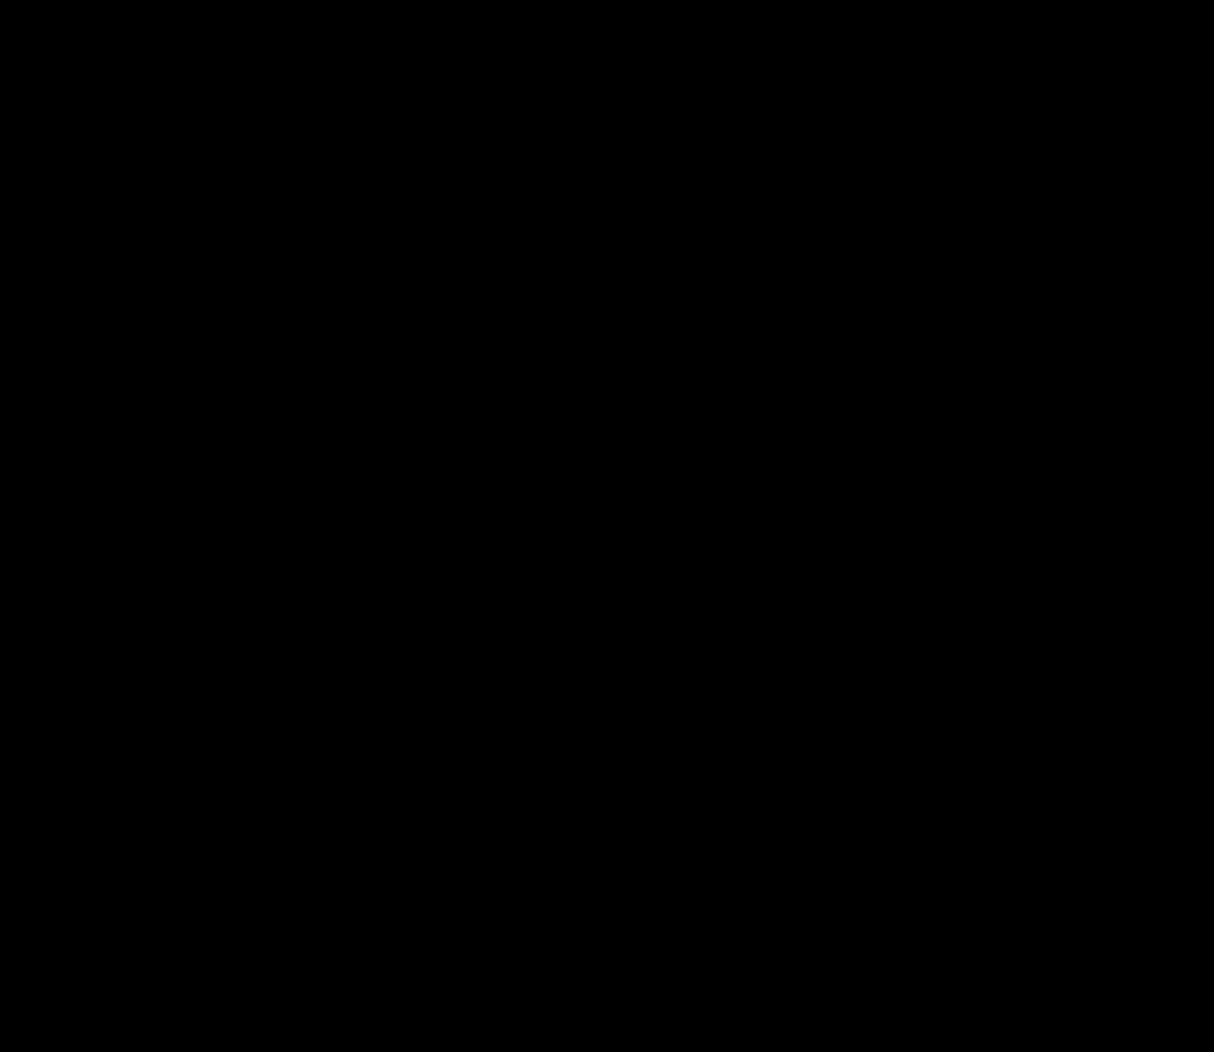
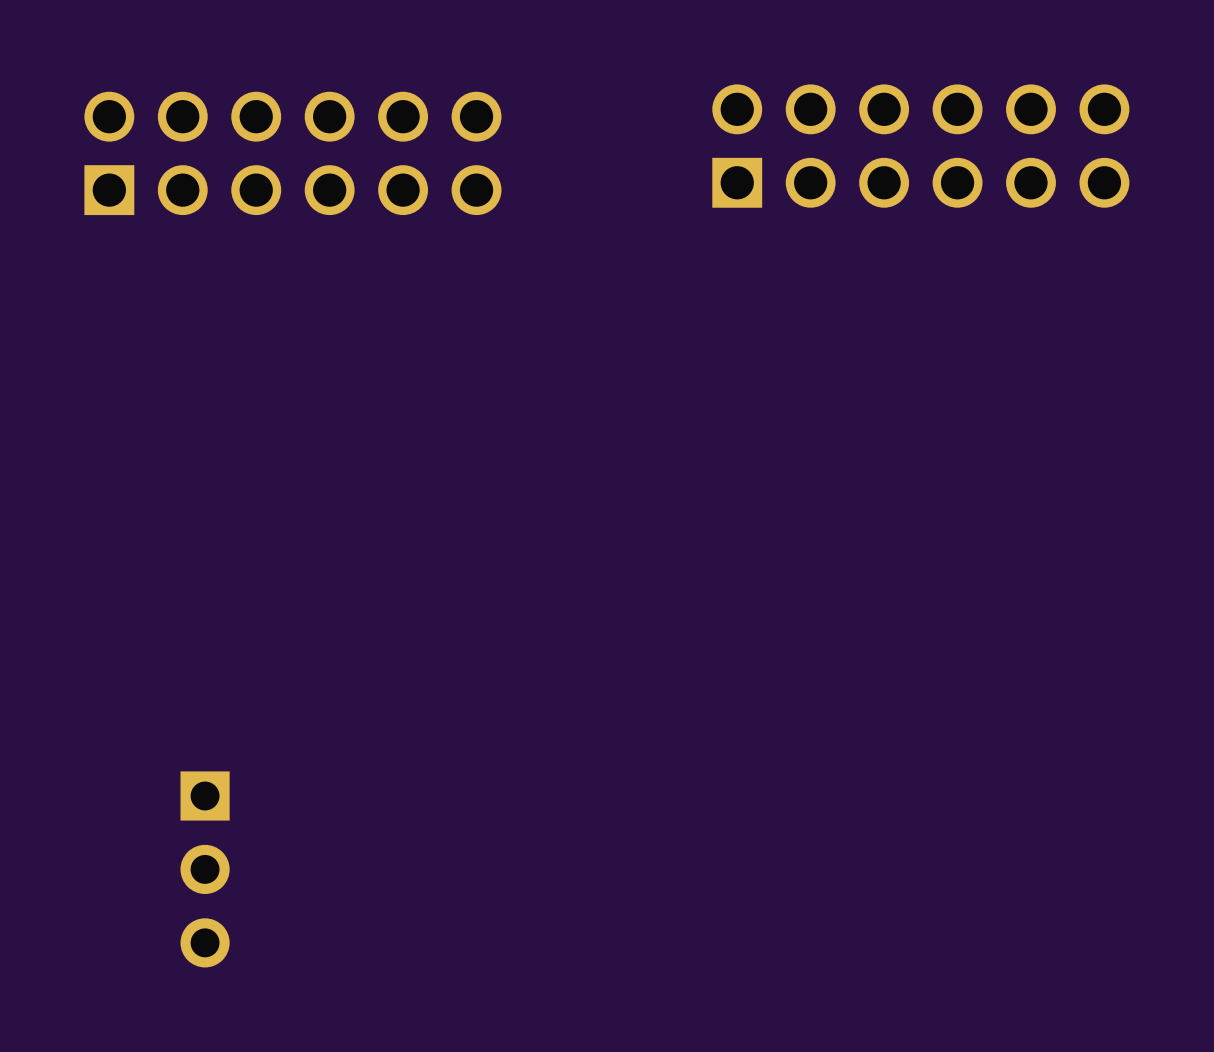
part: none -> (920, 146)
part: none -> (292, 153)
part: none -> (205, 869)

